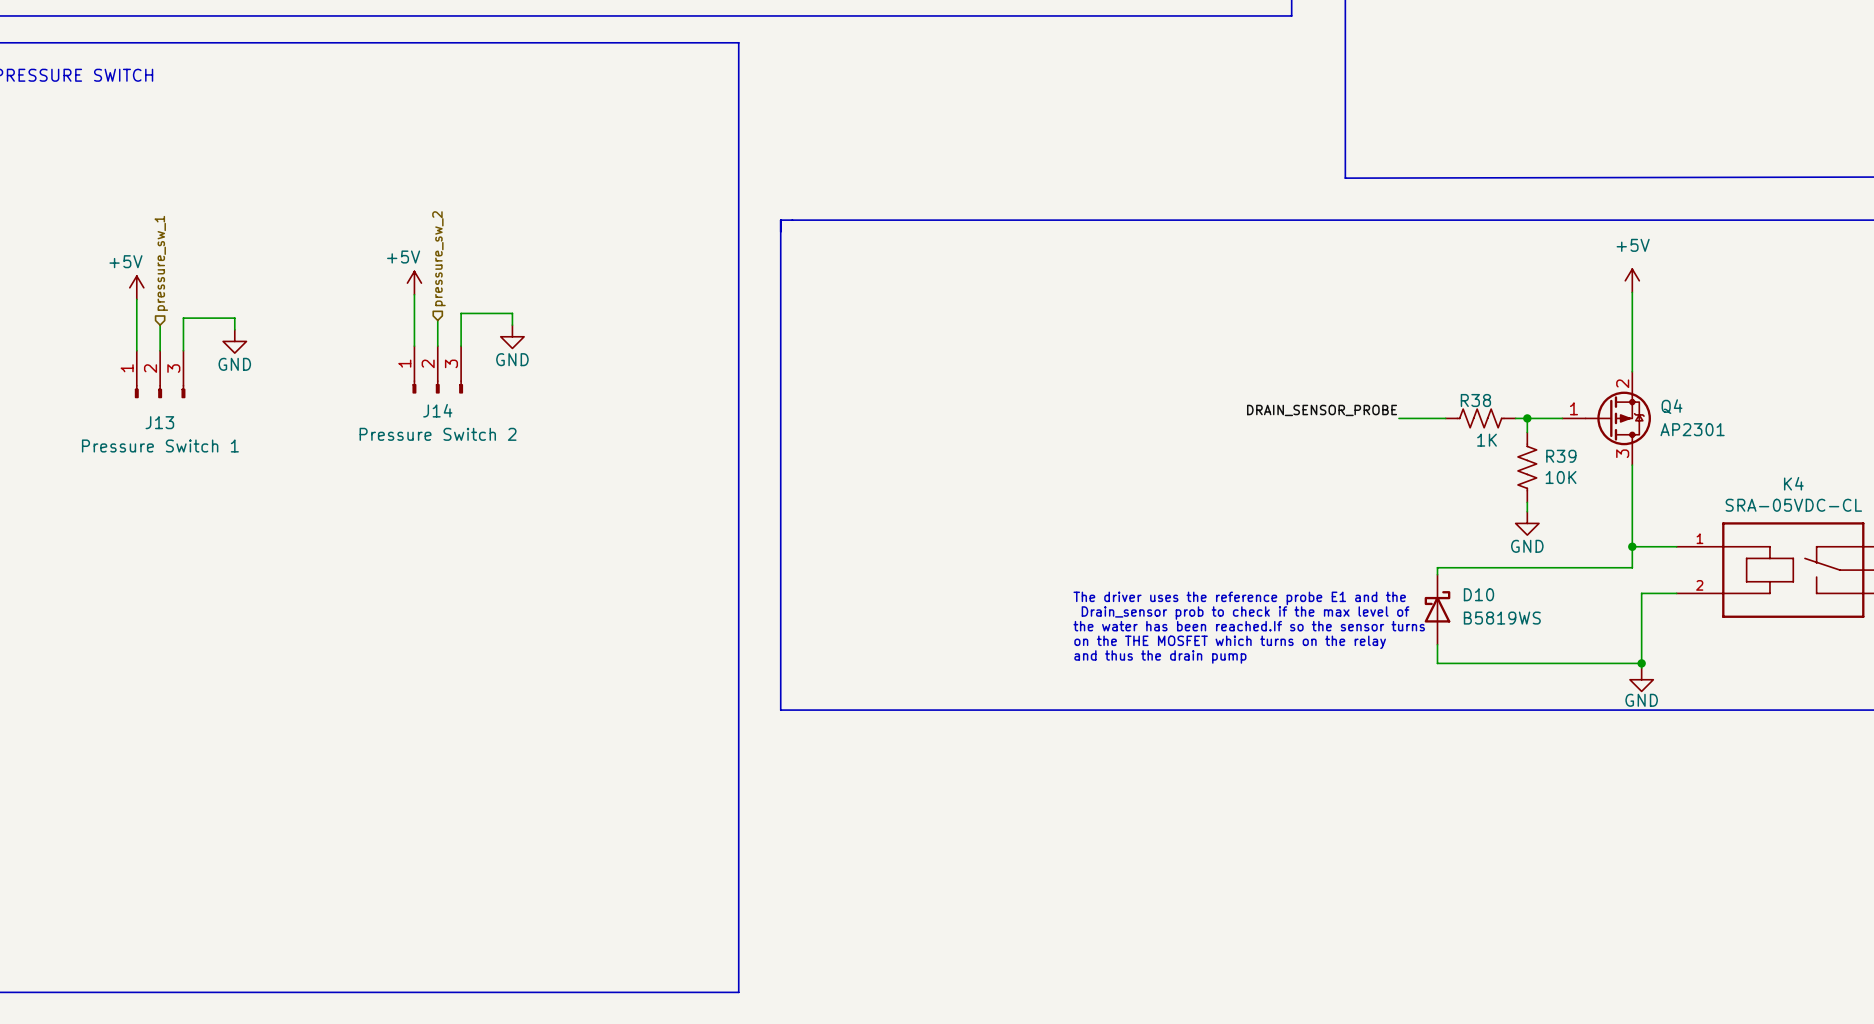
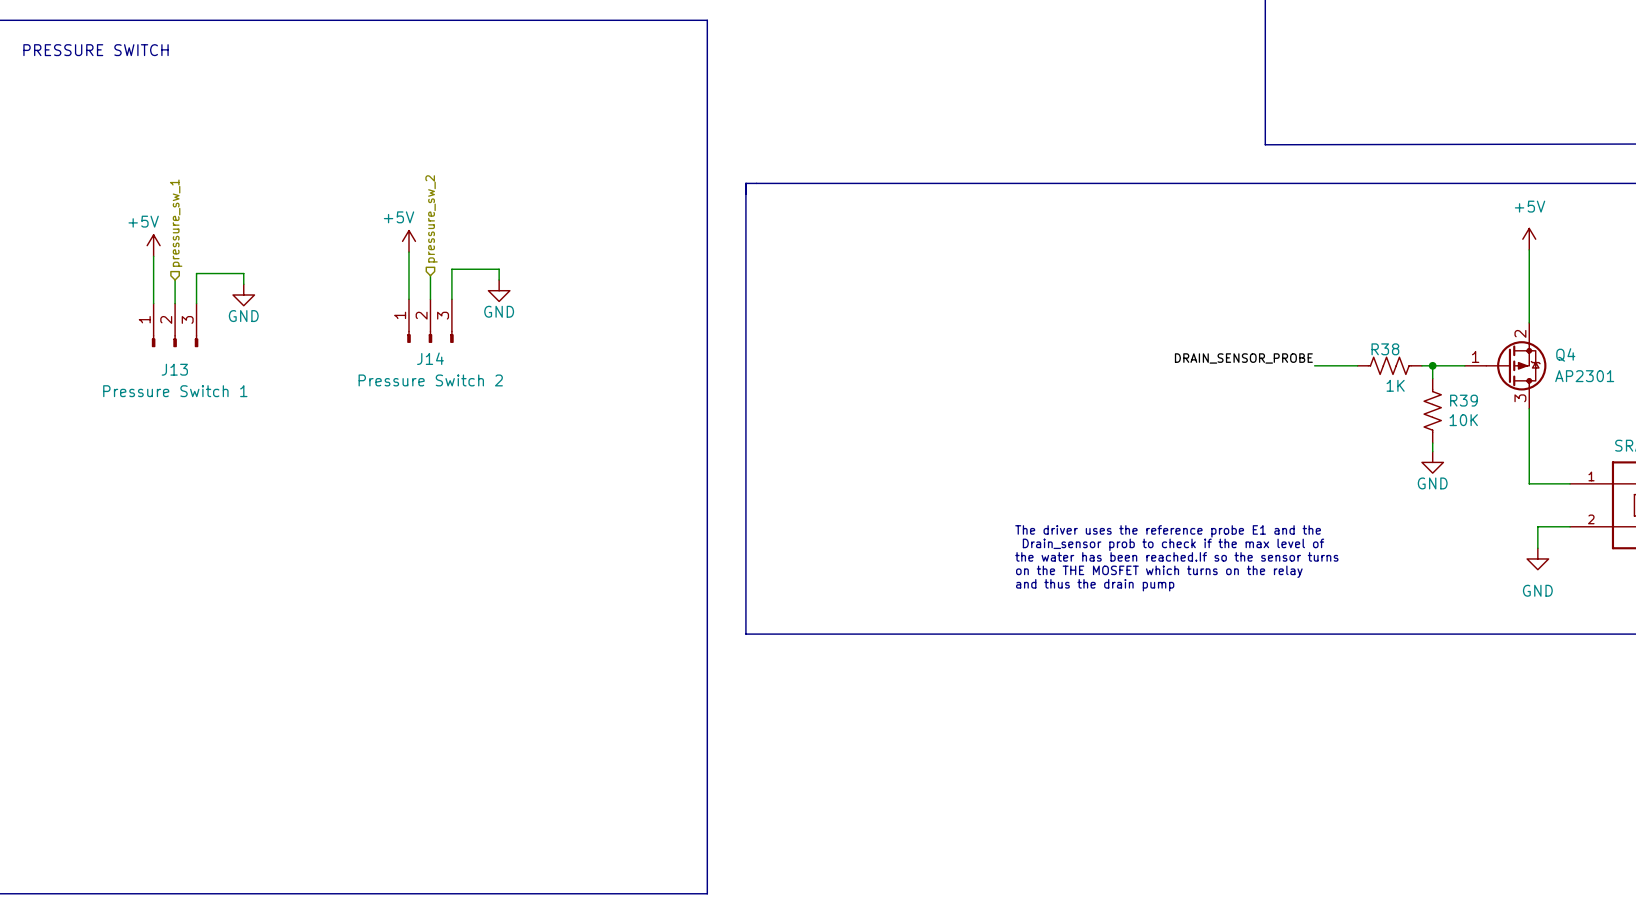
wire: (1632, 546) (1632, 567) (1437, 567) (1437, 574) -> none
junction: (1632, 546) -> none
D10: B5819WS (1437, 609) -> none
wire: (1641, 616) (1641, 668) -> none
wire: (1437, 644) (1437, 663) (1641, 663) -> none
junction: (1641, 663) -> none
power symbol position: GND (1641, 679) -> GND (1537, 558)
power symbol text position: GND (1641, 700) -> GND (1537, 590)

